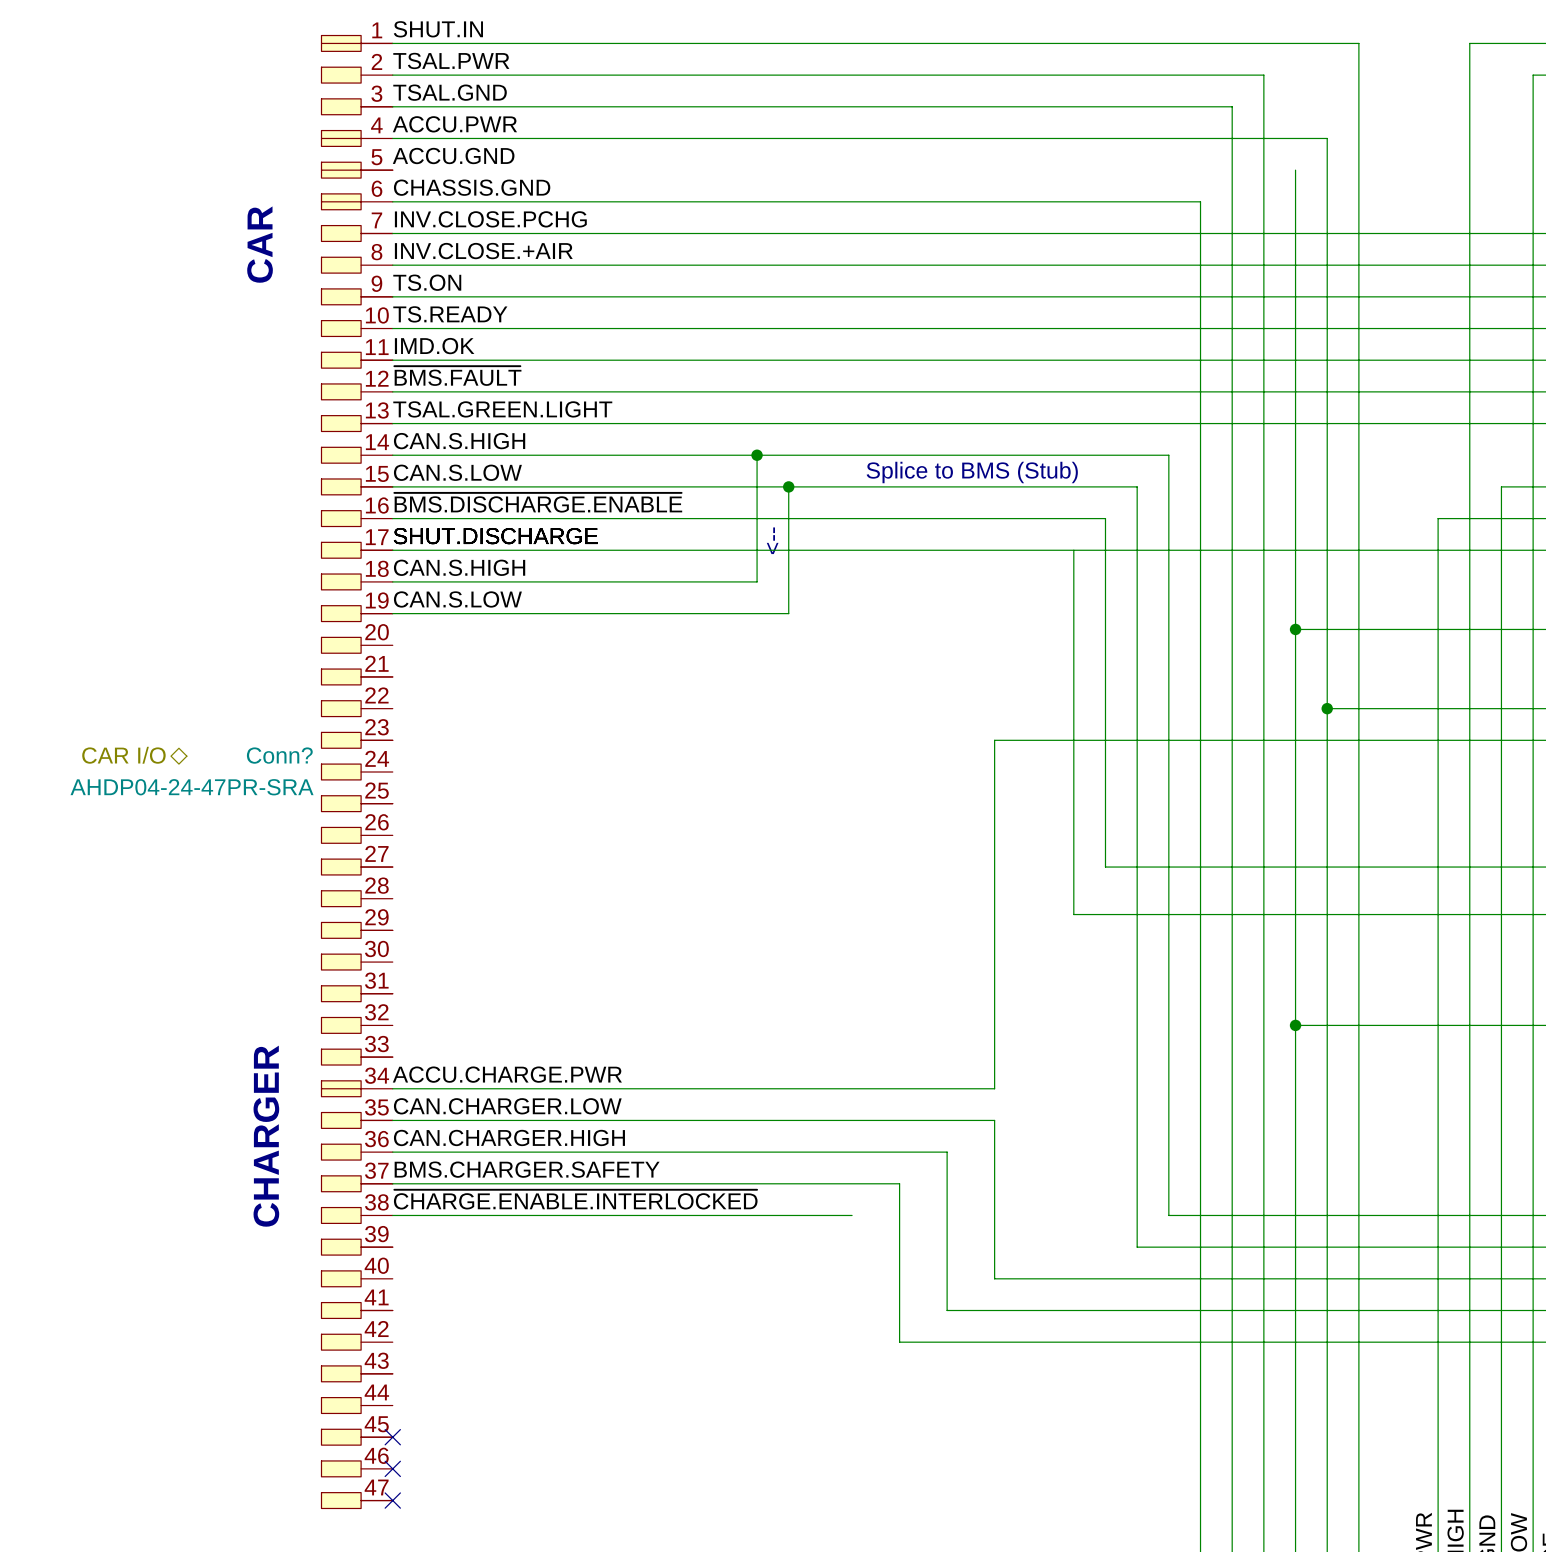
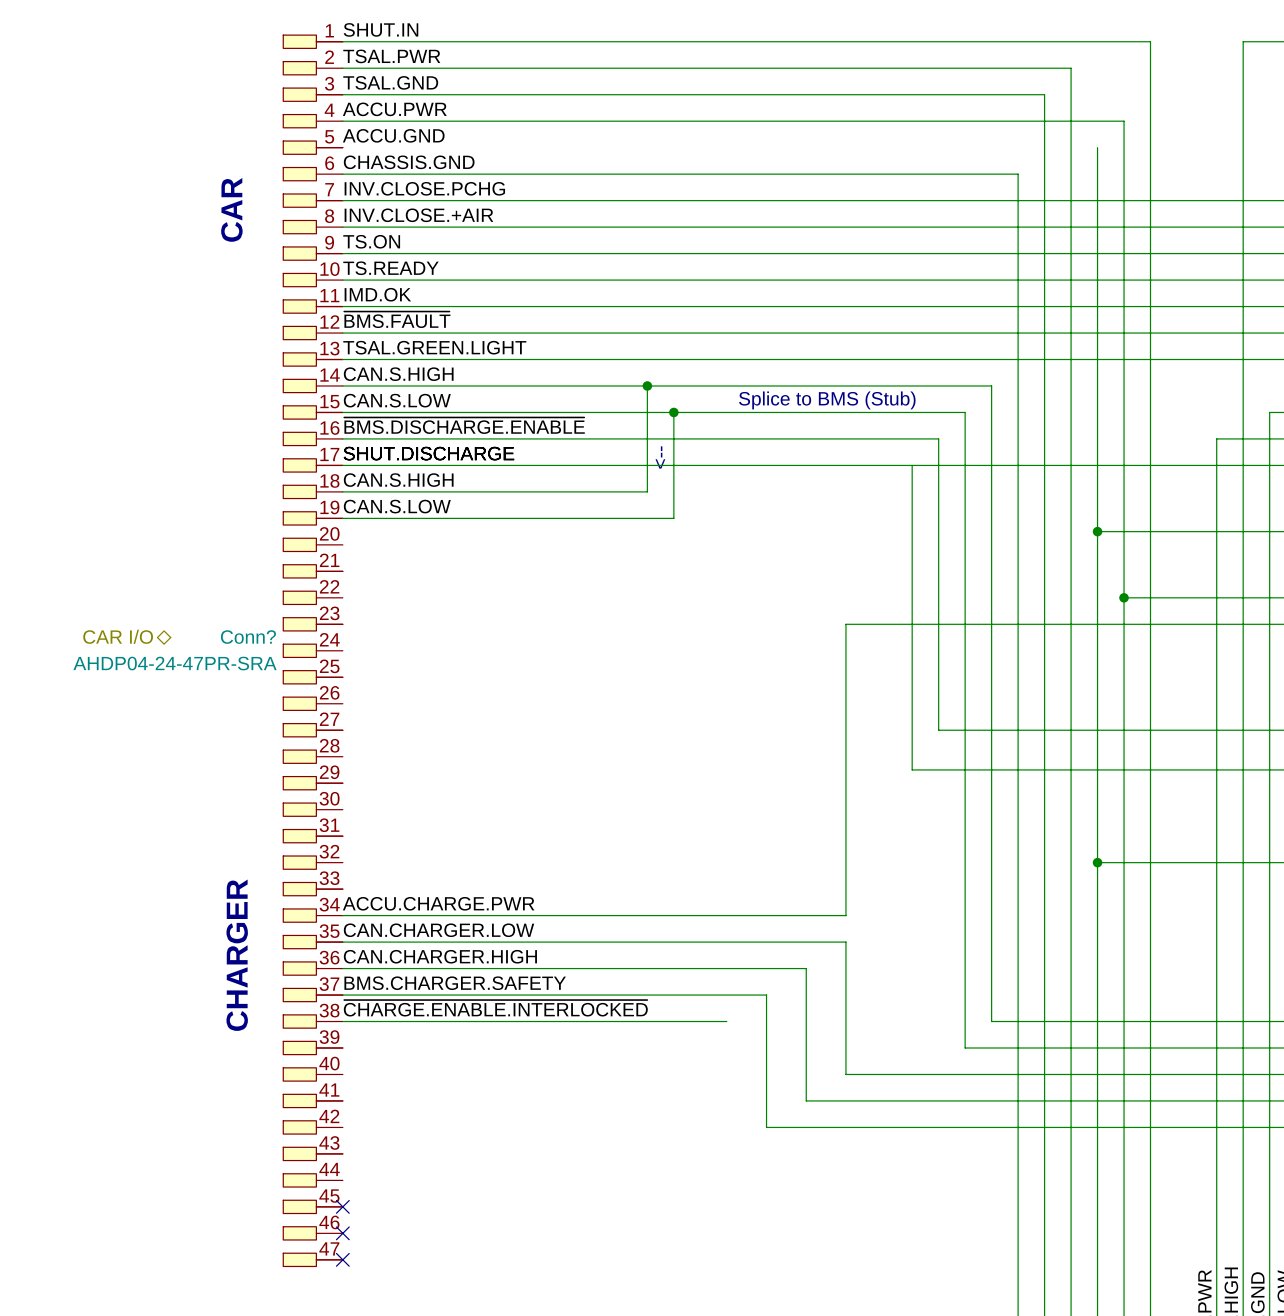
Conn? symbol: [321, 35, 393, 1509] -> [283, 35, 343, 1267]

